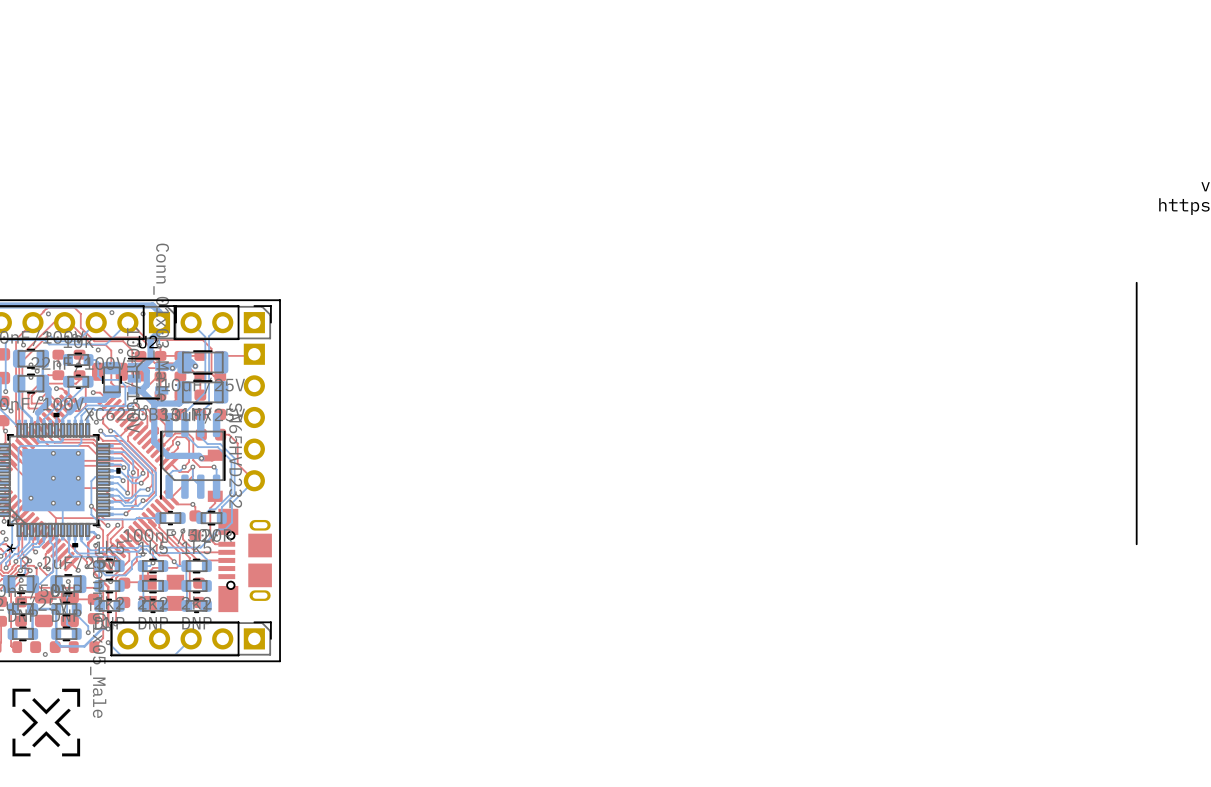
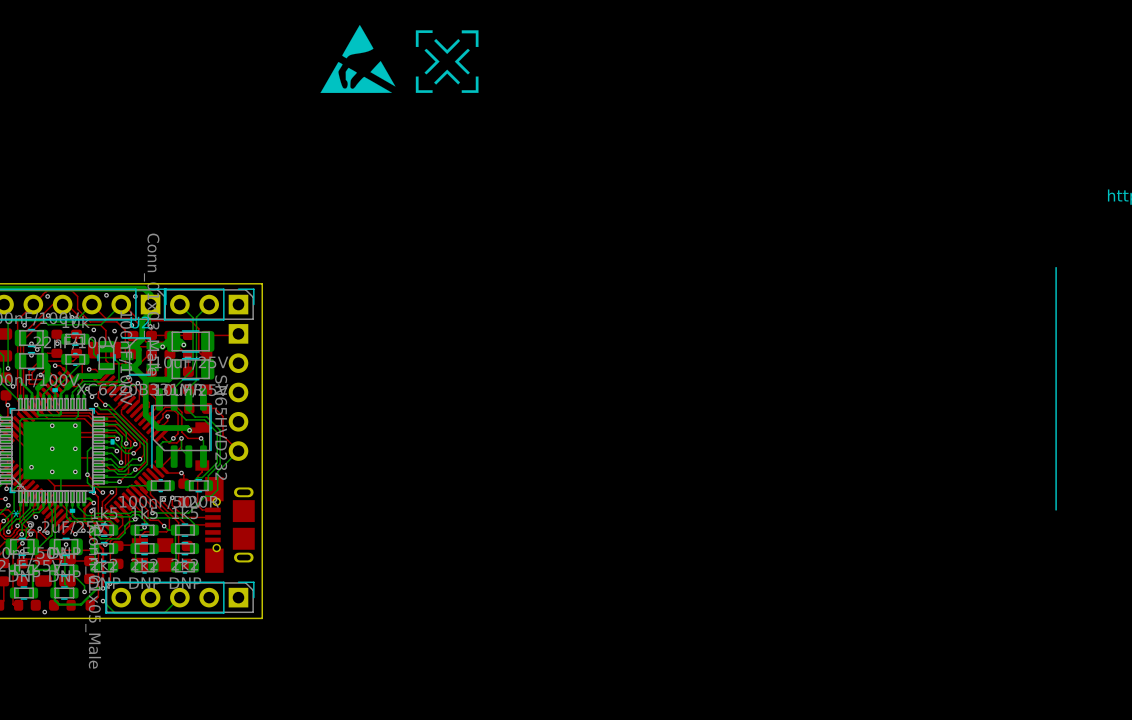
drawing: none -> [320, 24, 396, 93]
drawing: none -> [415, 30, 479, 93]
drawing: [12, 688, 81, 757] -> none

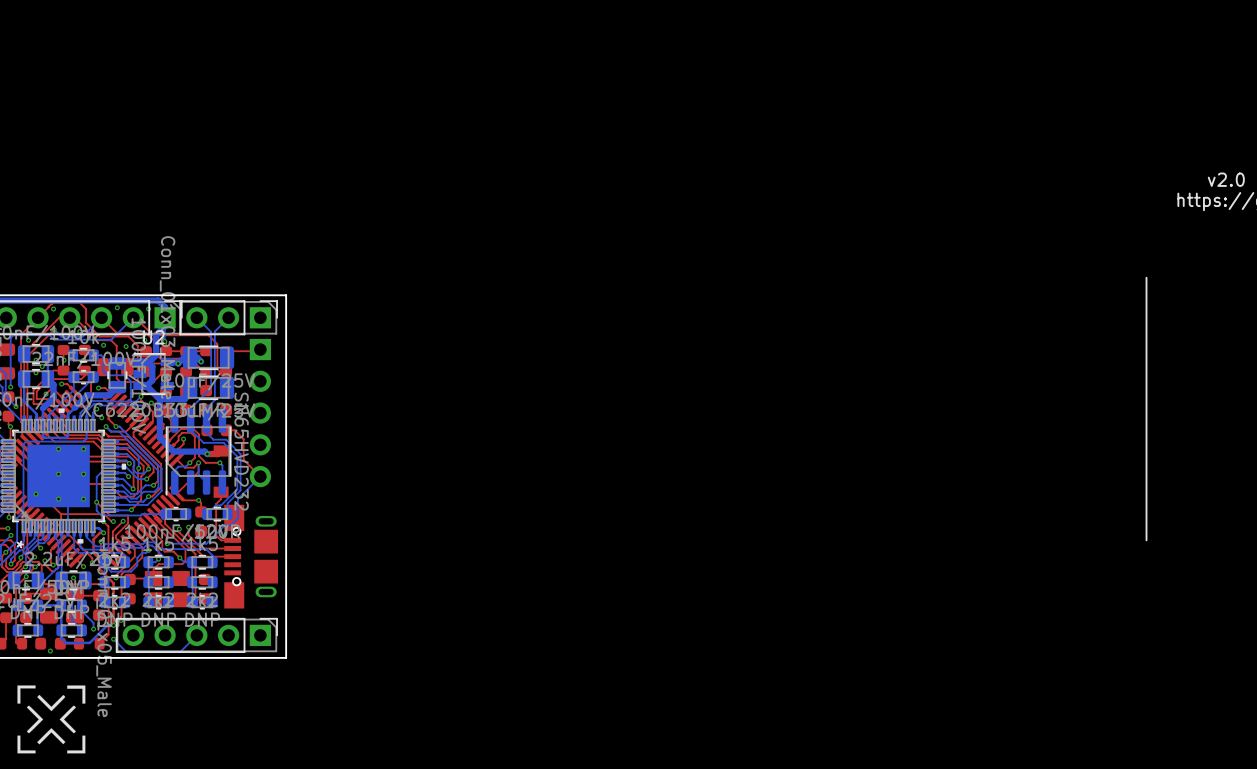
drawing: [320, 24, 396, 93] -> none
drawing: [415, 30, 479, 93] -> none
drawing: none -> [17, 685, 86, 754]

